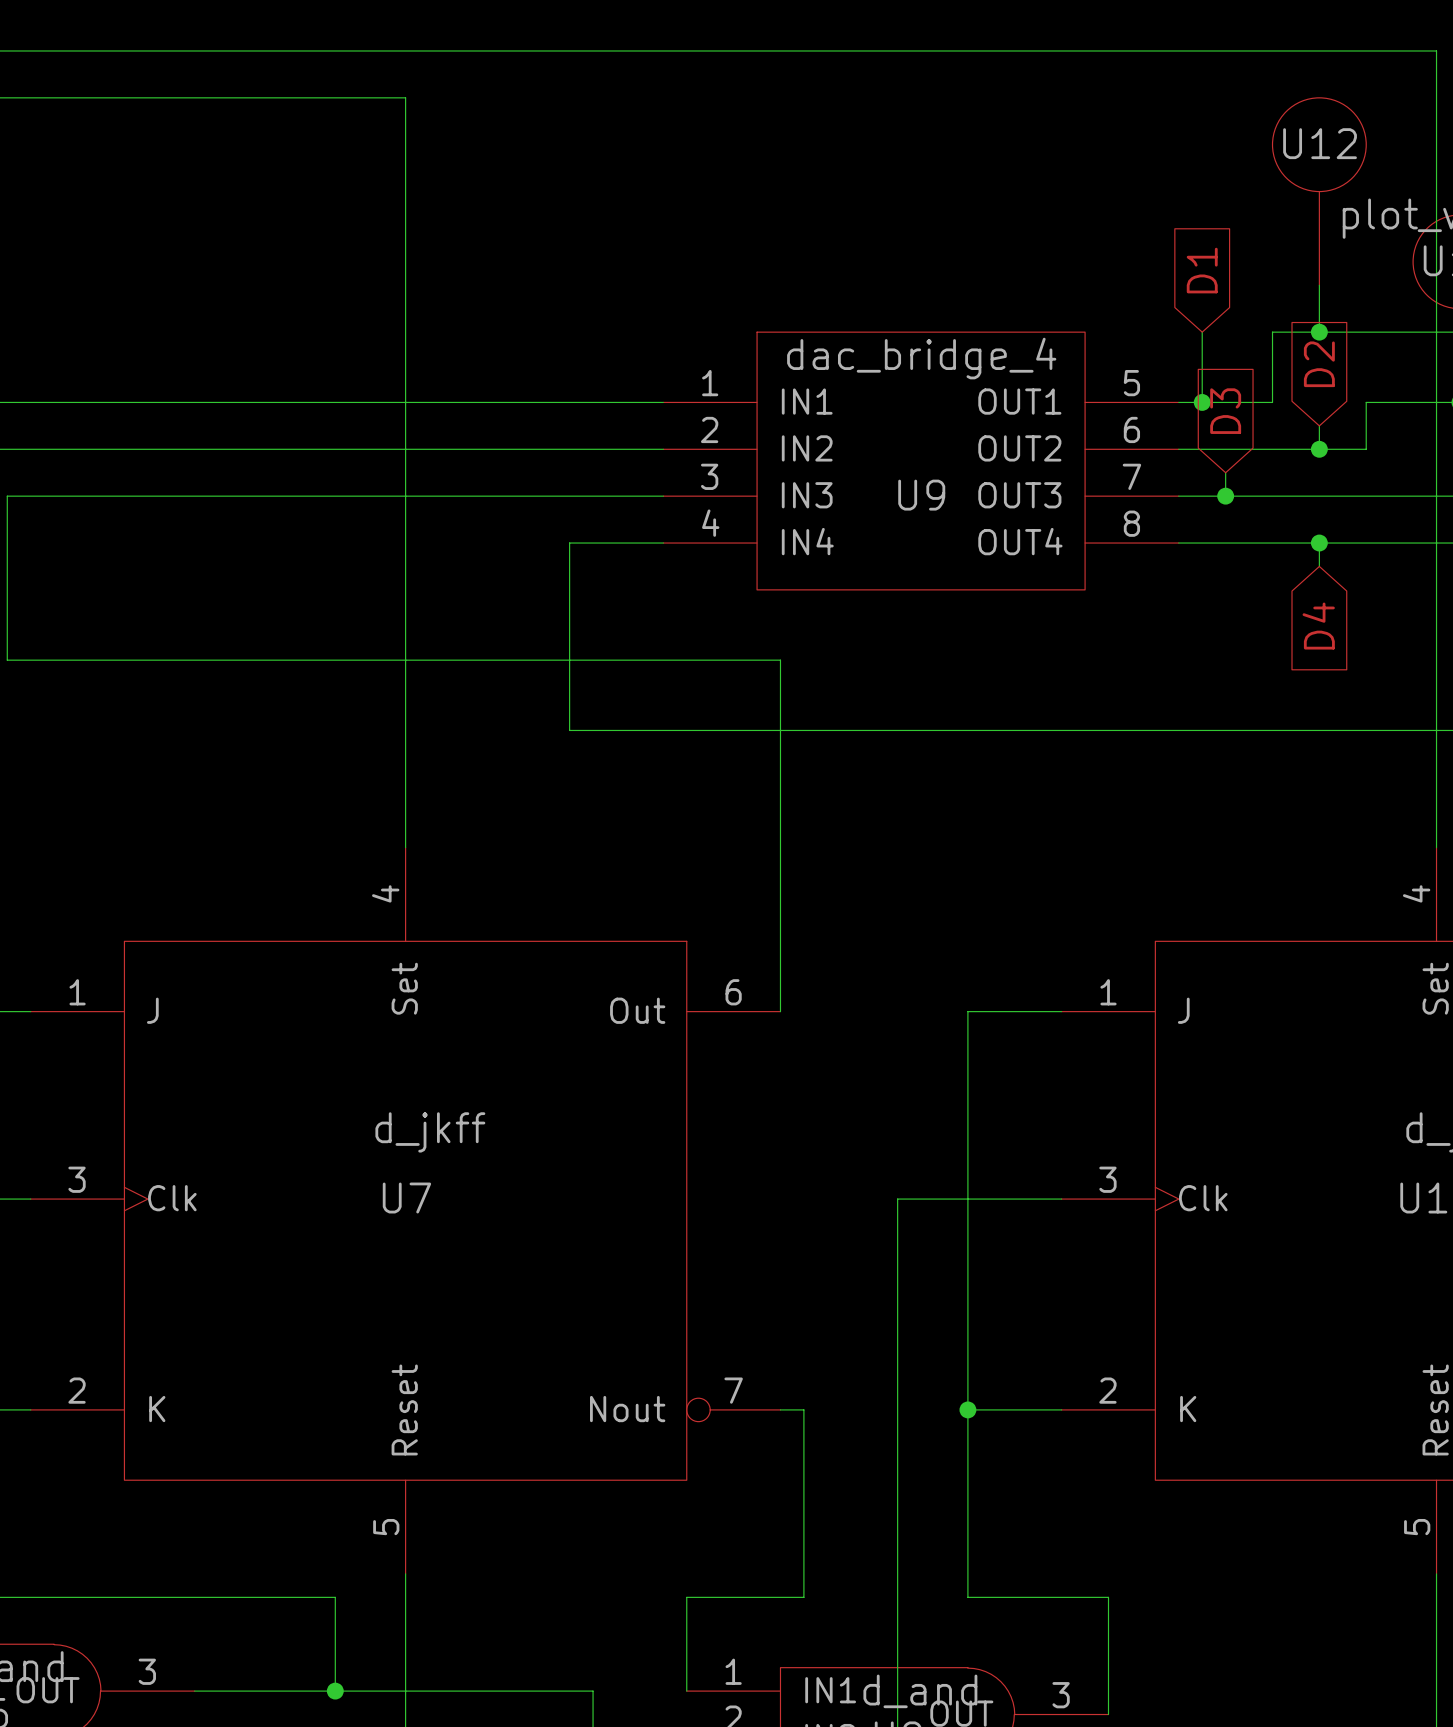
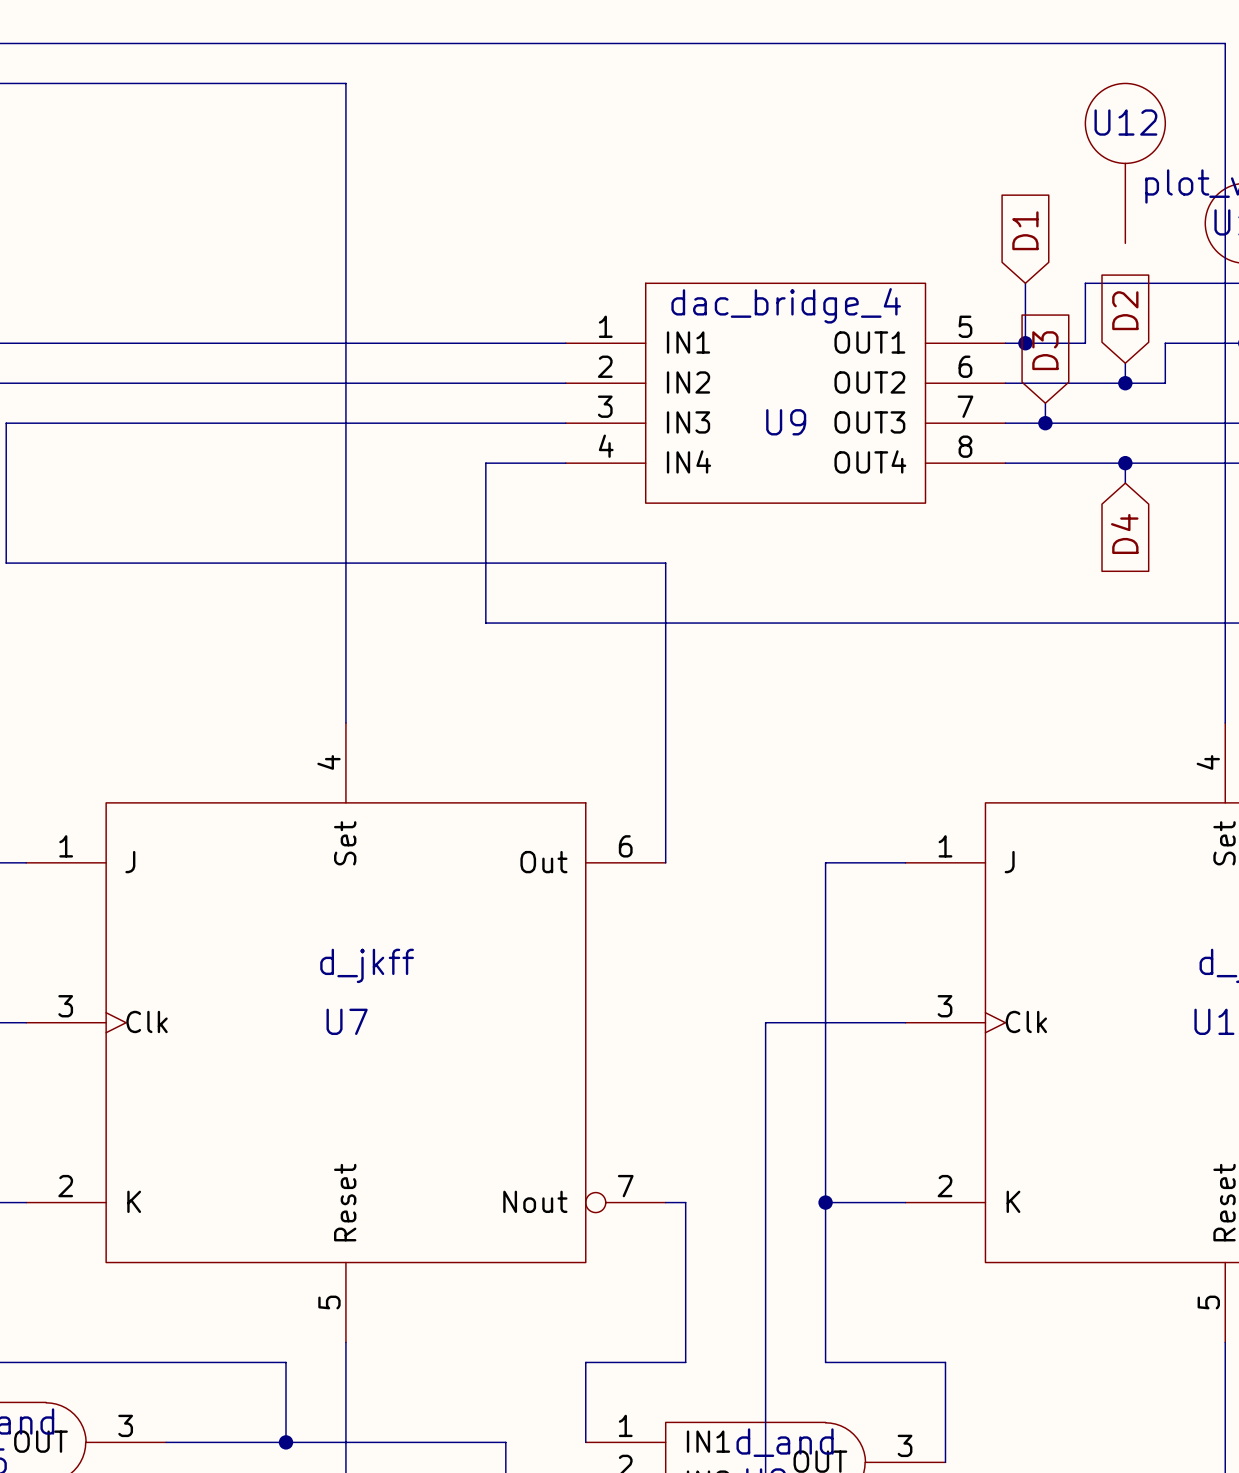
wire: (1319, 285) (1319, 332) -> none
junction: (1319, 332) -> none

